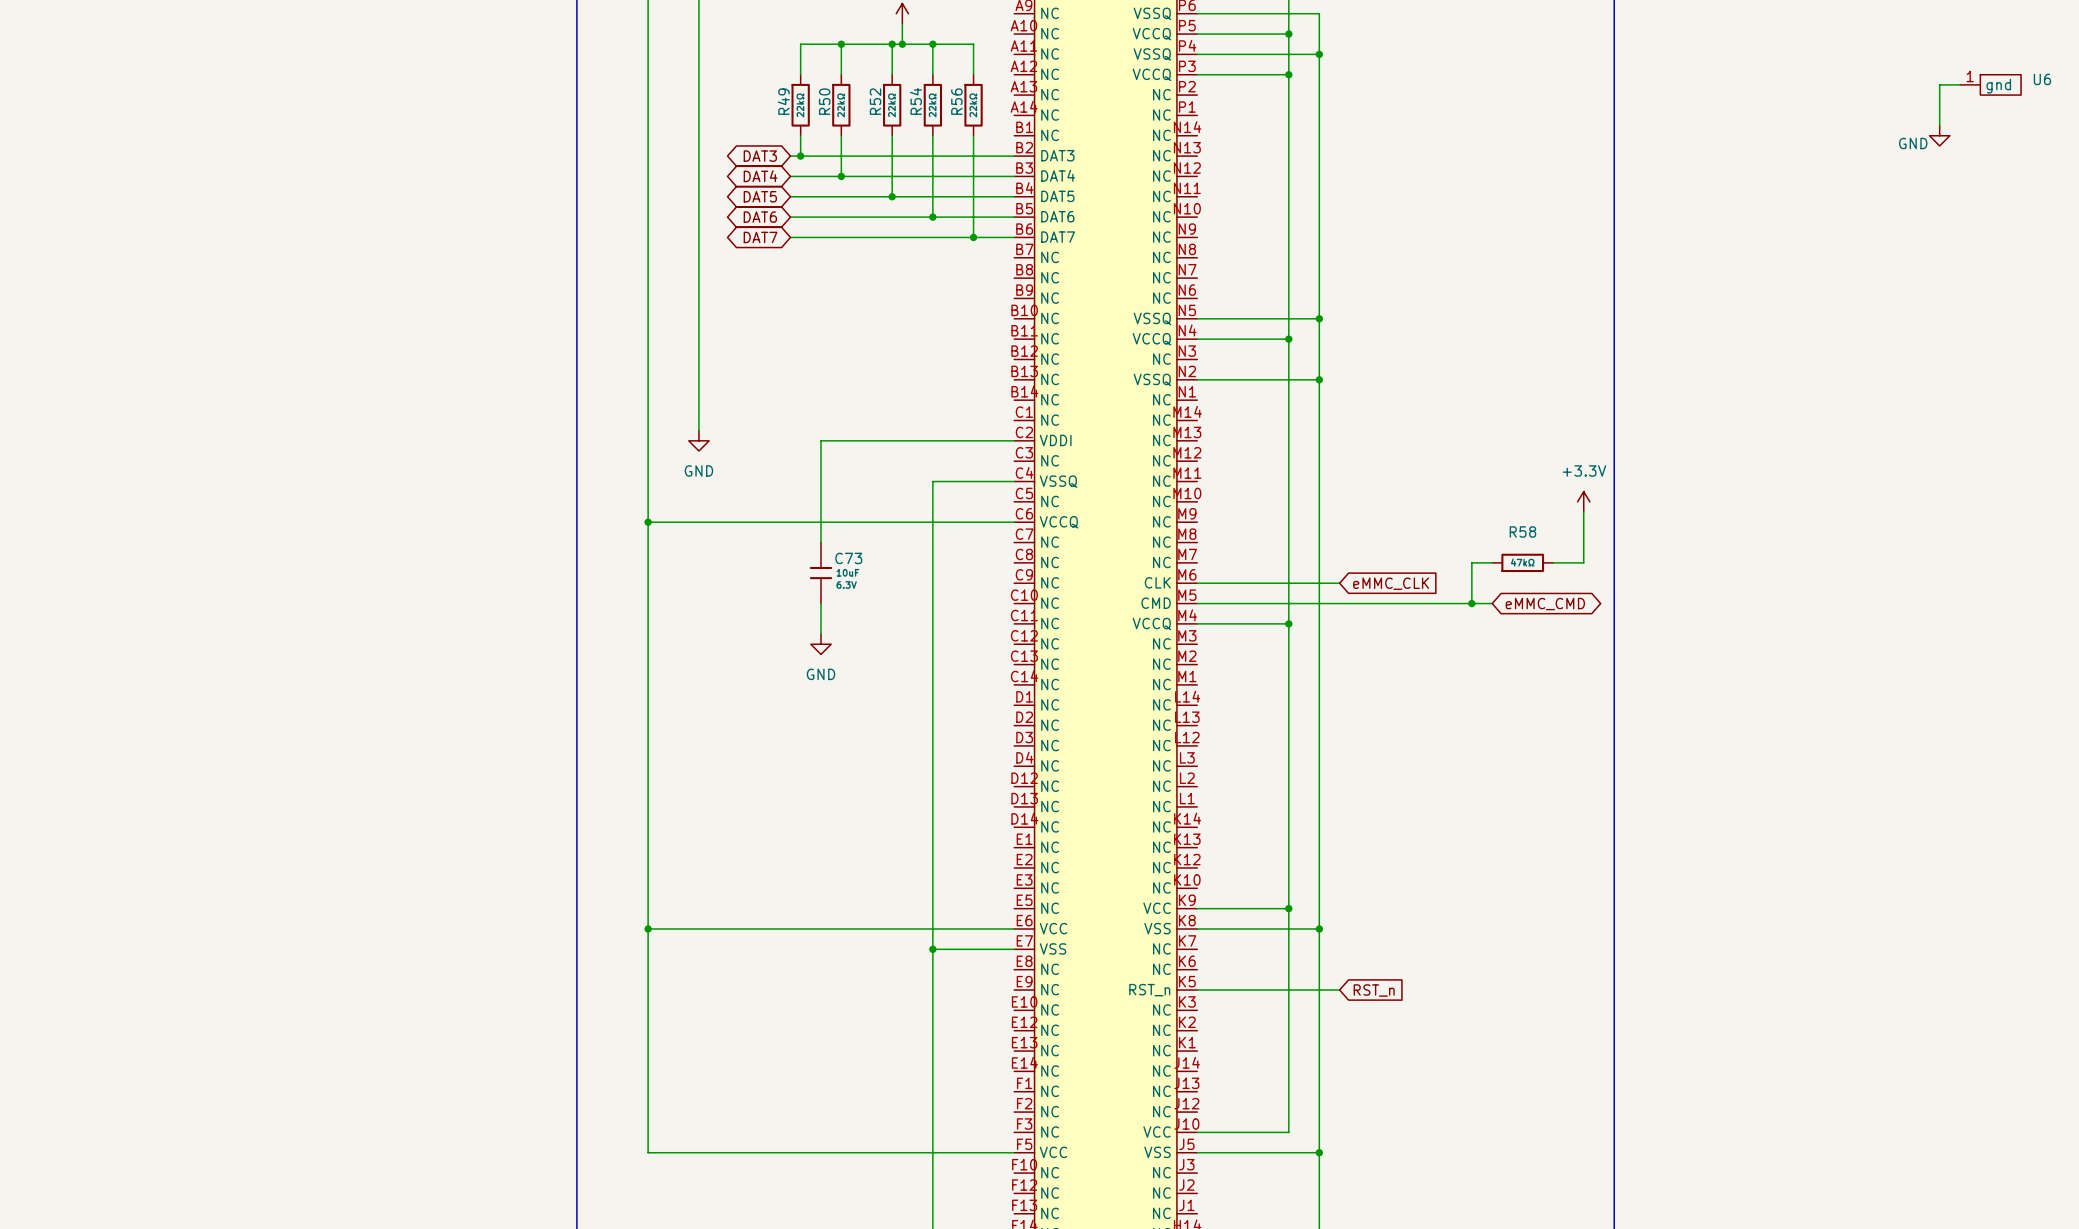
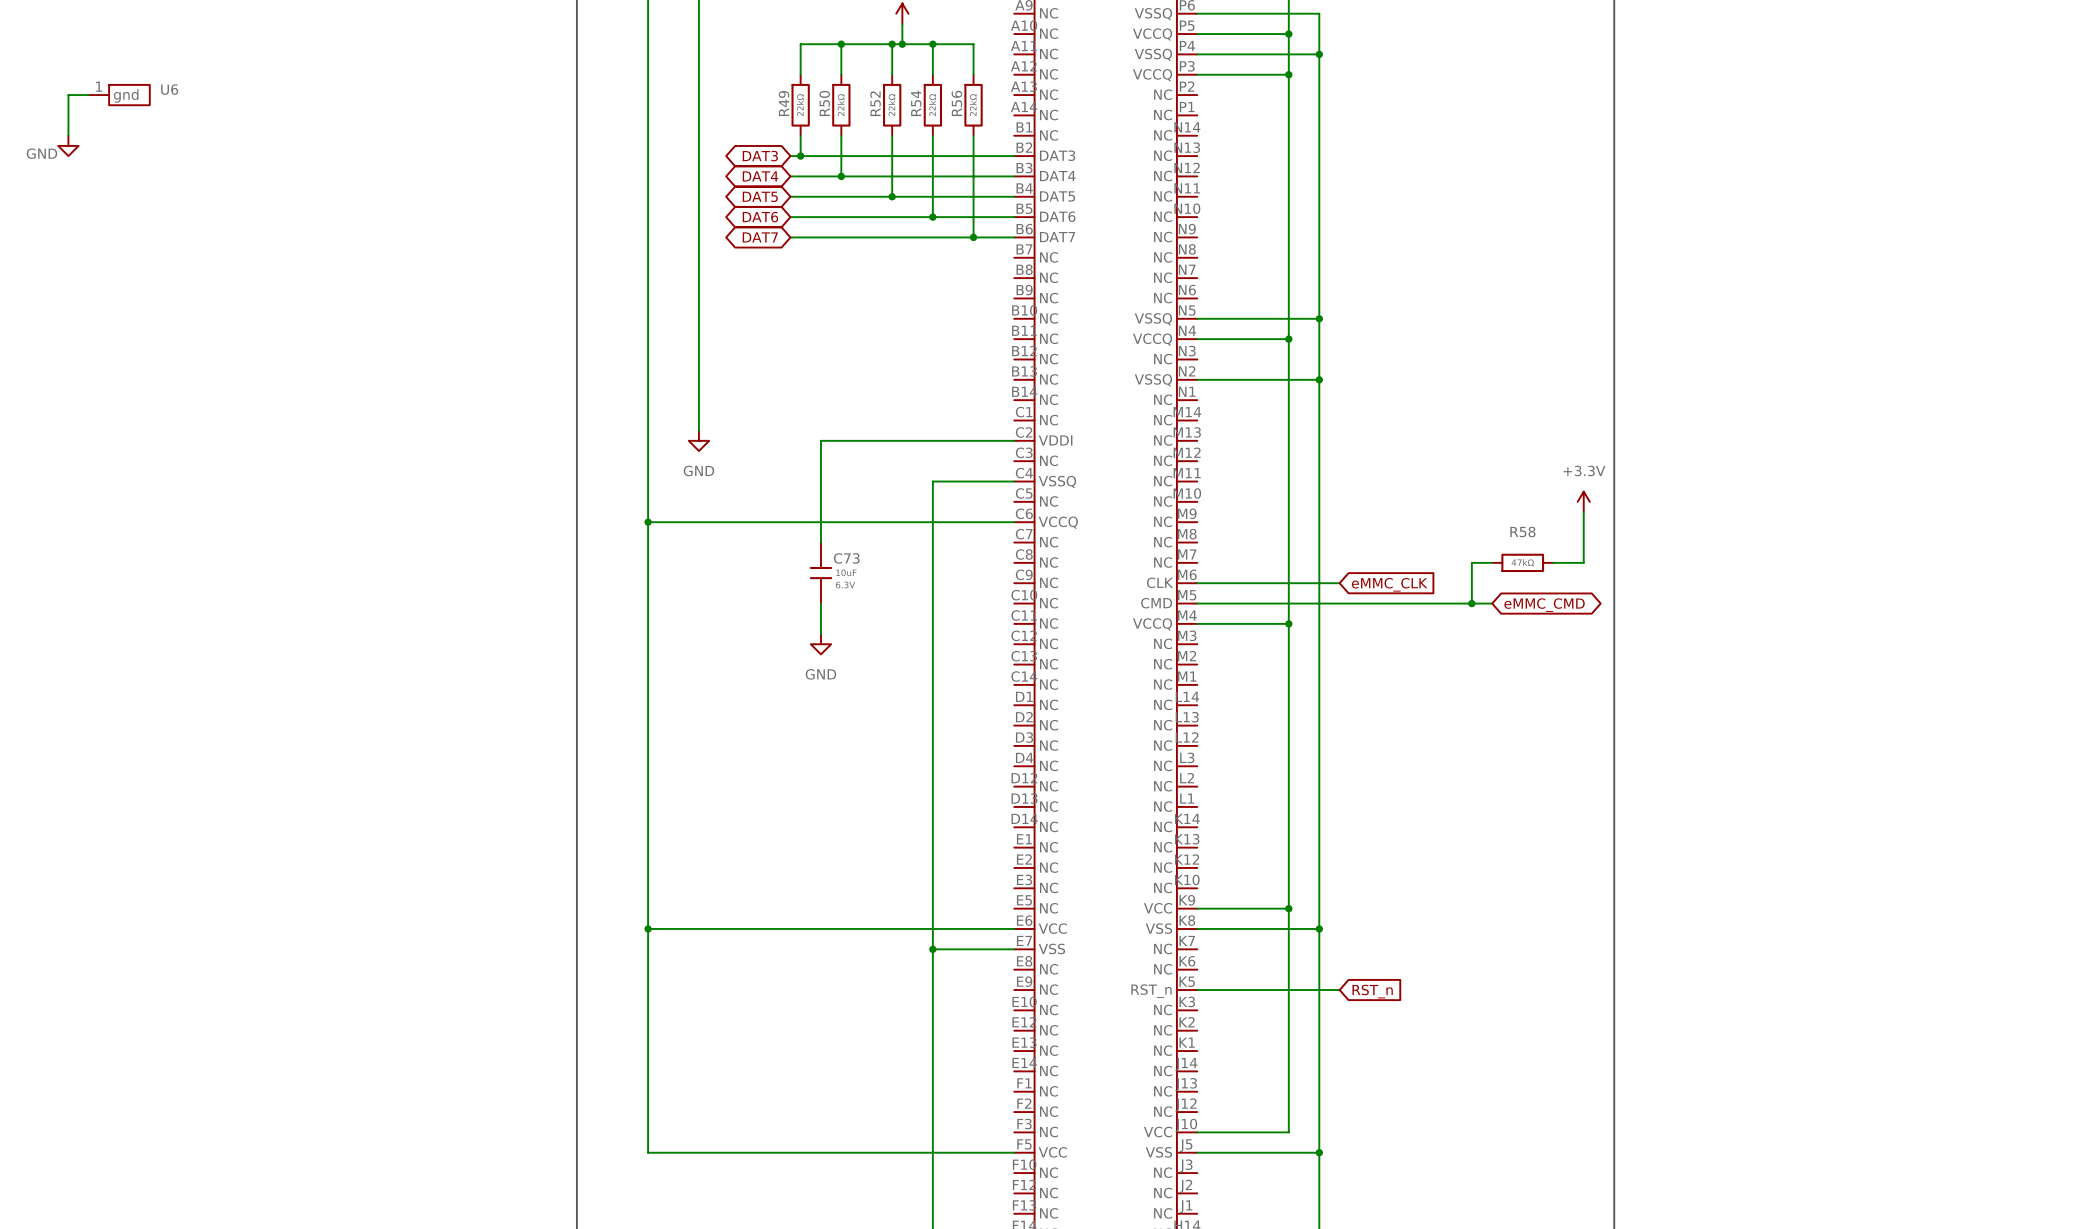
wire: (1960, 84) (1939, 84) (1939, 125) -> none
U6 position: (1990, 84) -> (119, 95)
wire: none -> (88, 95) (68, 95) (68, 135)
power symbol: GND (1939, 135) -> none
power symbol: none -> GND (68, 145)

